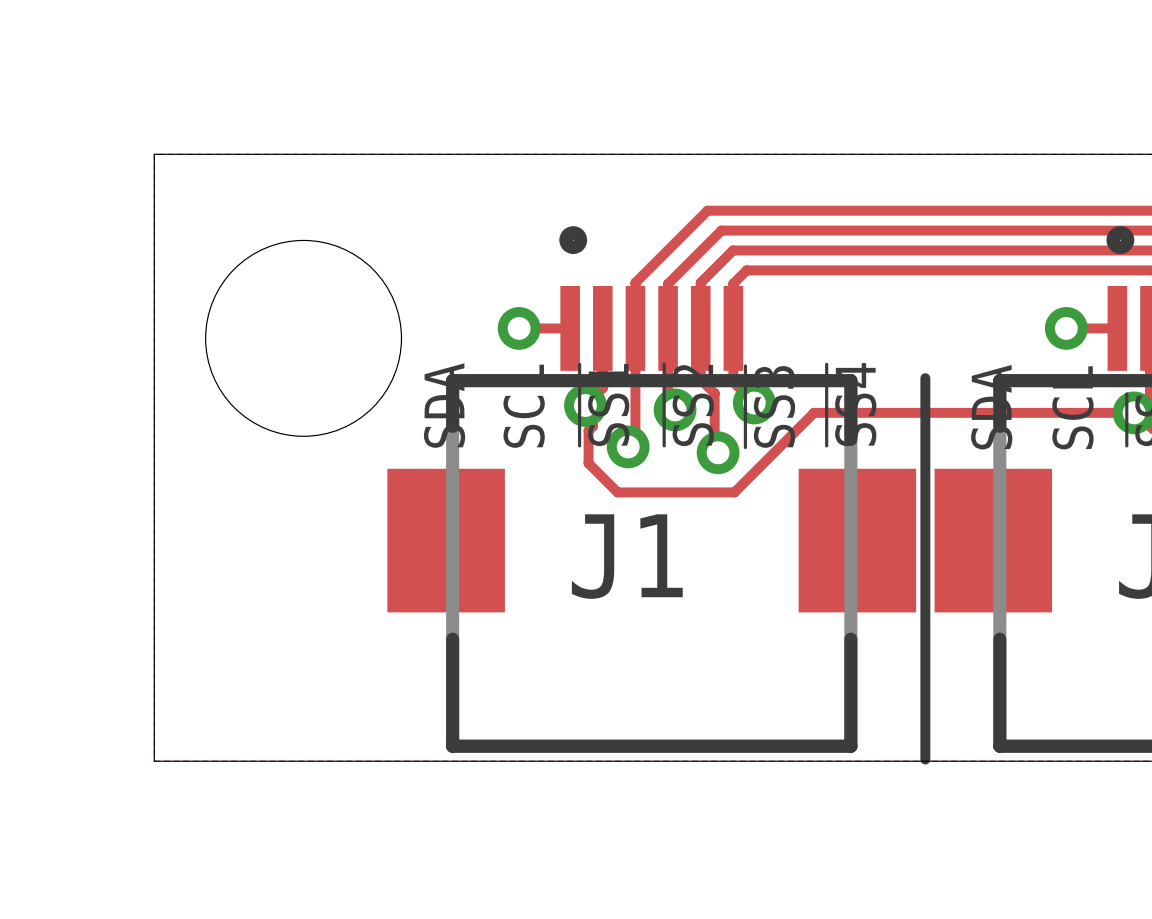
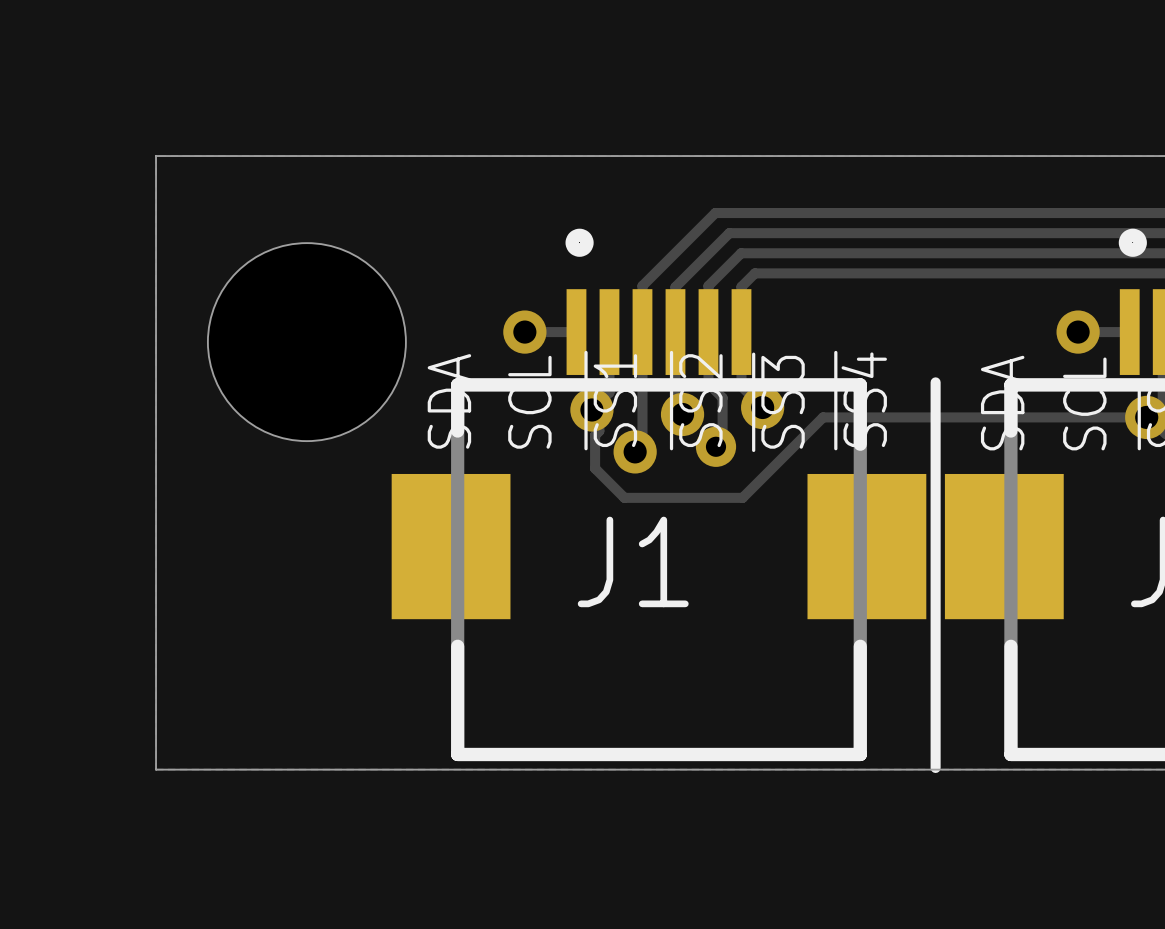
via position: (718, 452) -> (715, 446)

